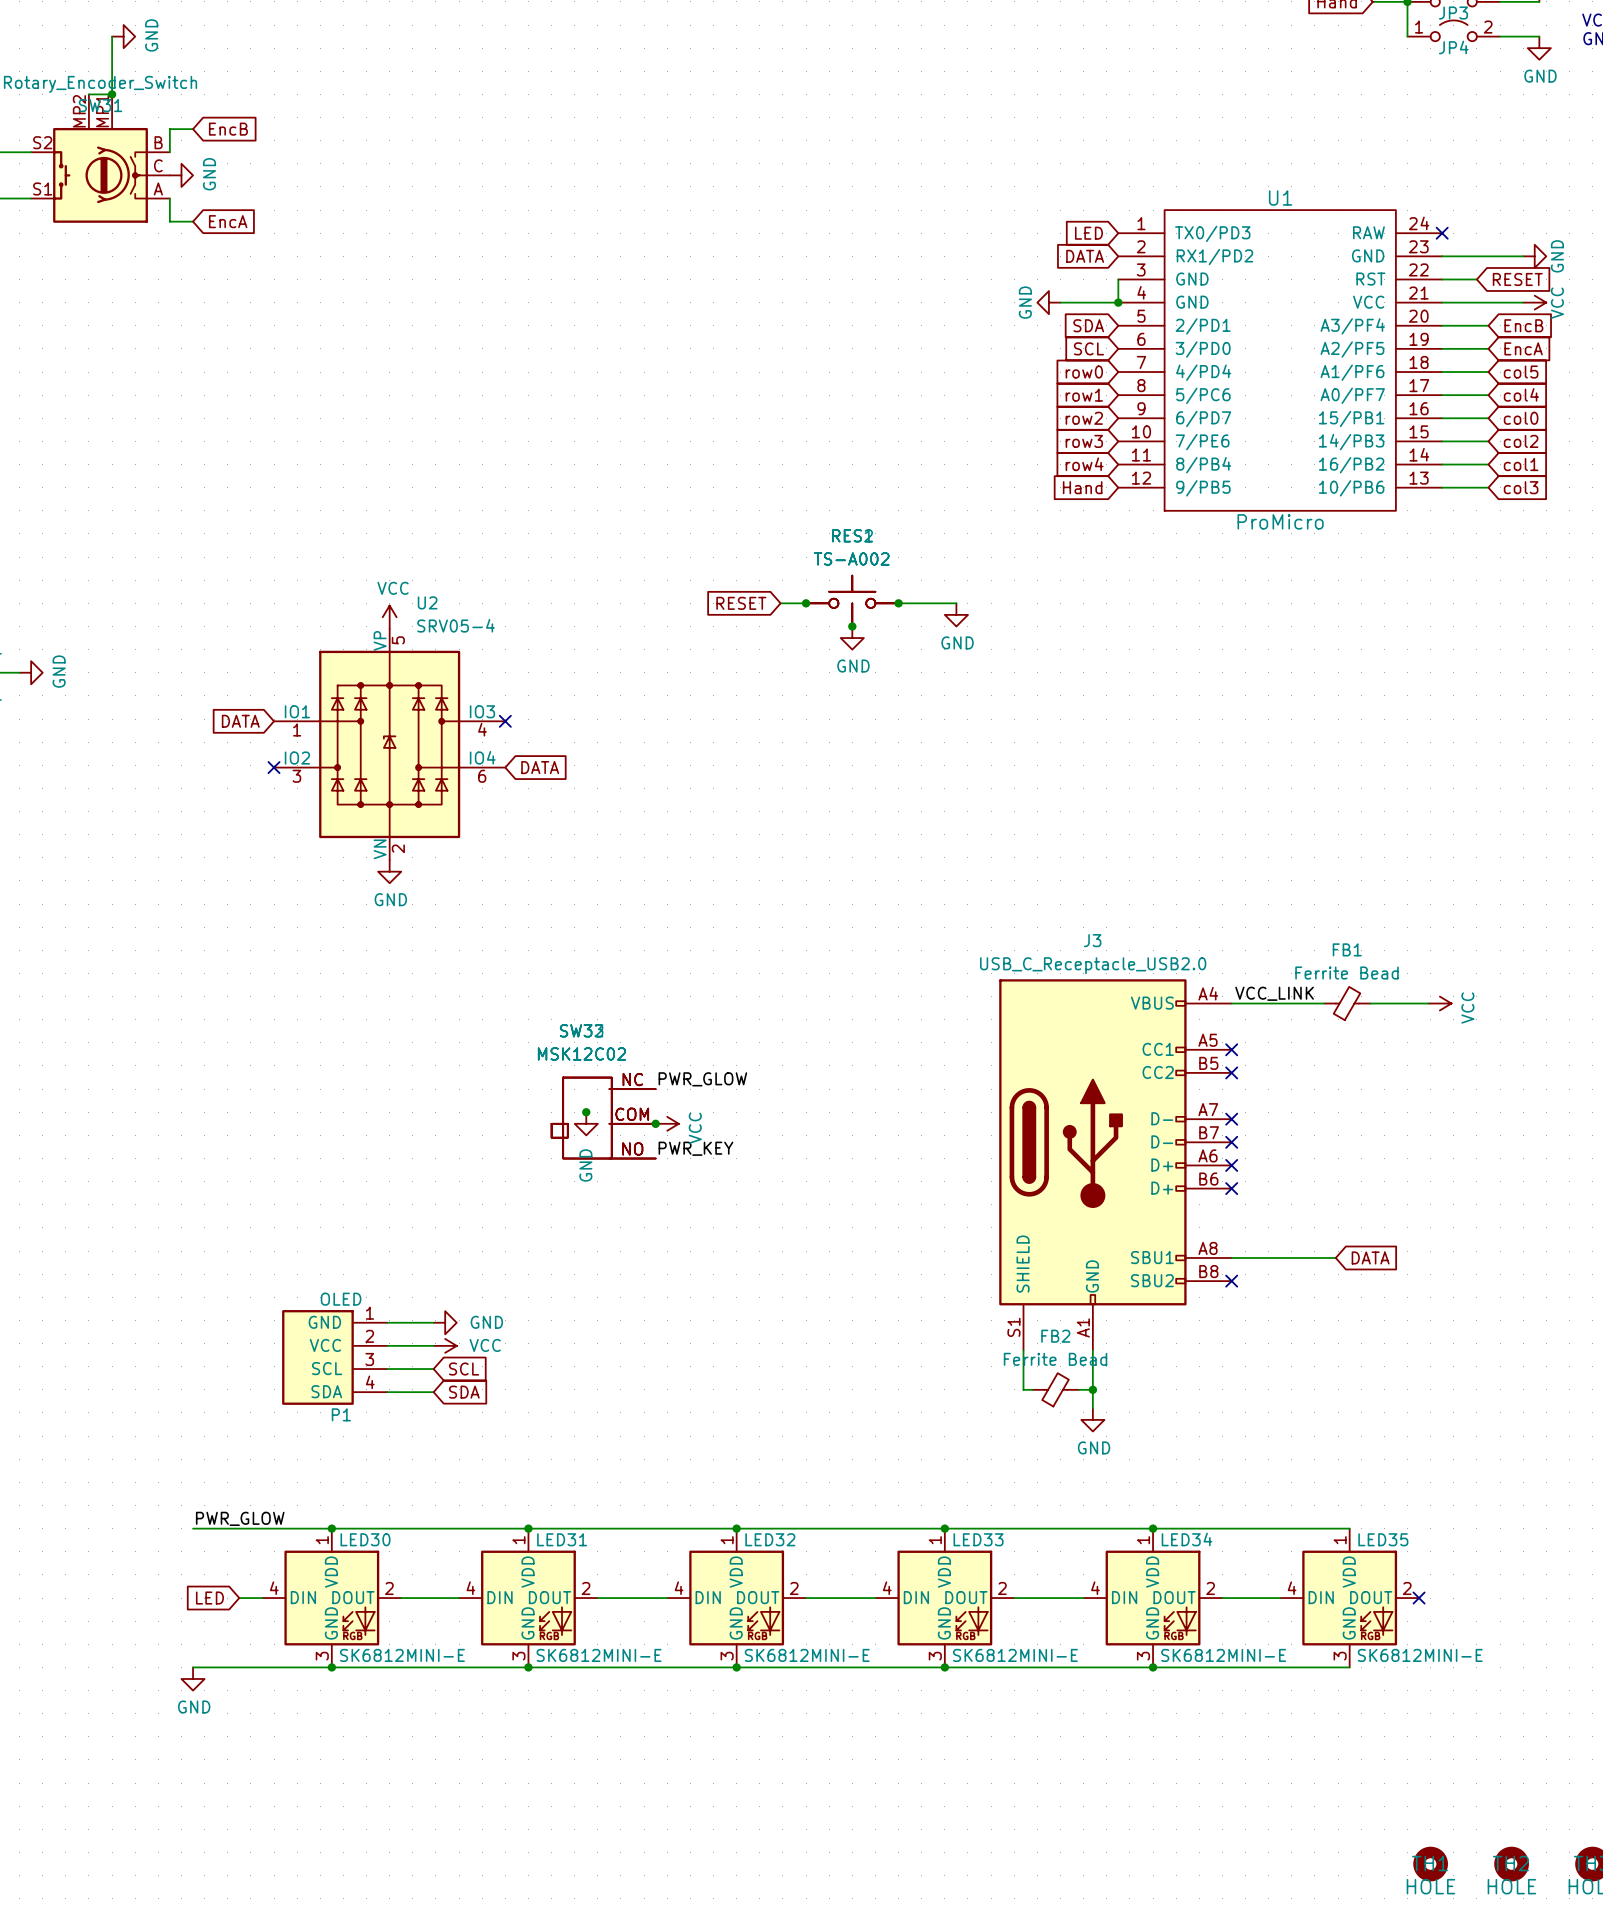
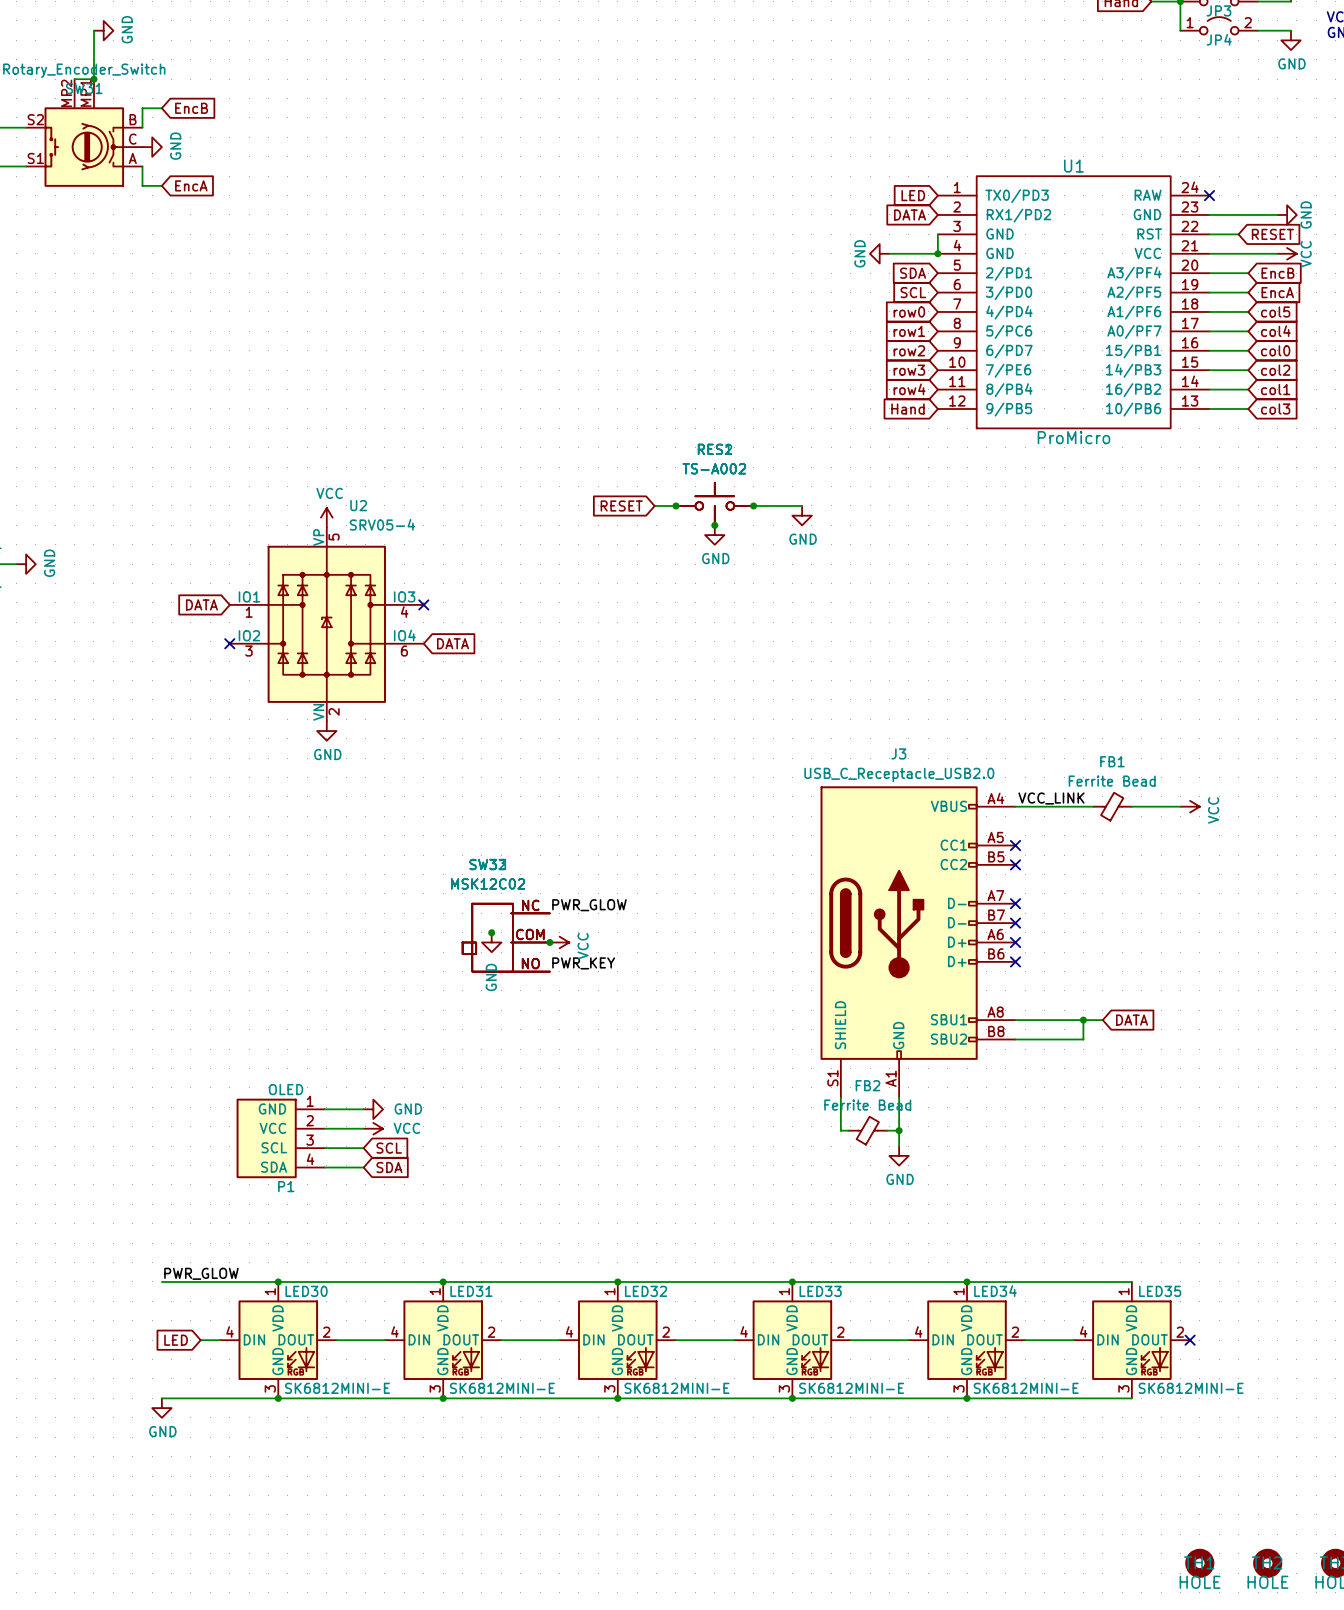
label position: VCC_LINK (1274, 993) -> VCC_LINK (1051, 798)
wire: (1231, 1003) (1324, 1003) -> (1015, 806) (1093, 806)
FB1 position: (1347, 1003) -> (1112, 806)
wire: (1370, 1003) (1428, 1003) -> (1131, 806) (1180, 806)
power symbol position: VCC (1439, 1003) -> VCC (1190, 806)
no-connect mark: none -> (1015, 845)
no-connect mark: none -> (1015, 864)
no-connect mark: (1231, 1049) -> none
no-connect mark: (1231, 1072) -> none
no-connect mark: none -> (1015, 903)
no-connect mark: none -> (1015, 923)
no-connect mark: (1231, 1119) -> none
no-connect mark: none -> (1015, 942)
no-connect mark: (1231, 1142) -> none
no-connect mark: none -> (1015, 961)
J3 position: (1115, 1164) -> (918, 942)
no-connect mark: (1231, 1165) -> none
no-connect mark: (1231, 1188) -> none
wire: none -> (1083, 1020) (1083, 1039) (1015, 1039)
junction: none -> (1083, 1020)
wire: (1231, 1257) (1335, 1257) -> (1015, 1020) (1102, 1020)
global label position: DATA (1370, 1257) -> DATA (1132, 1020)
no-connect mark: (1231, 1281) -> none
wire: (1023, 1350) (1023, 1389) (1032, 1389) -> (840, 1097) (840, 1130) (848, 1130)
wire: (1092, 1350) (1092, 1408) -> (899, 1097) (899, 1146)
FB2 position: (1055, 1389) -> (868, 1130)
wire: (1079, 1389) (1092, 1389) -> (887, 1130) (899, 1130)
junction position: (1092, 1389) -> (899, 1130)
power symbol position: GND (1092, 1419) -> GND (899, 1155)

